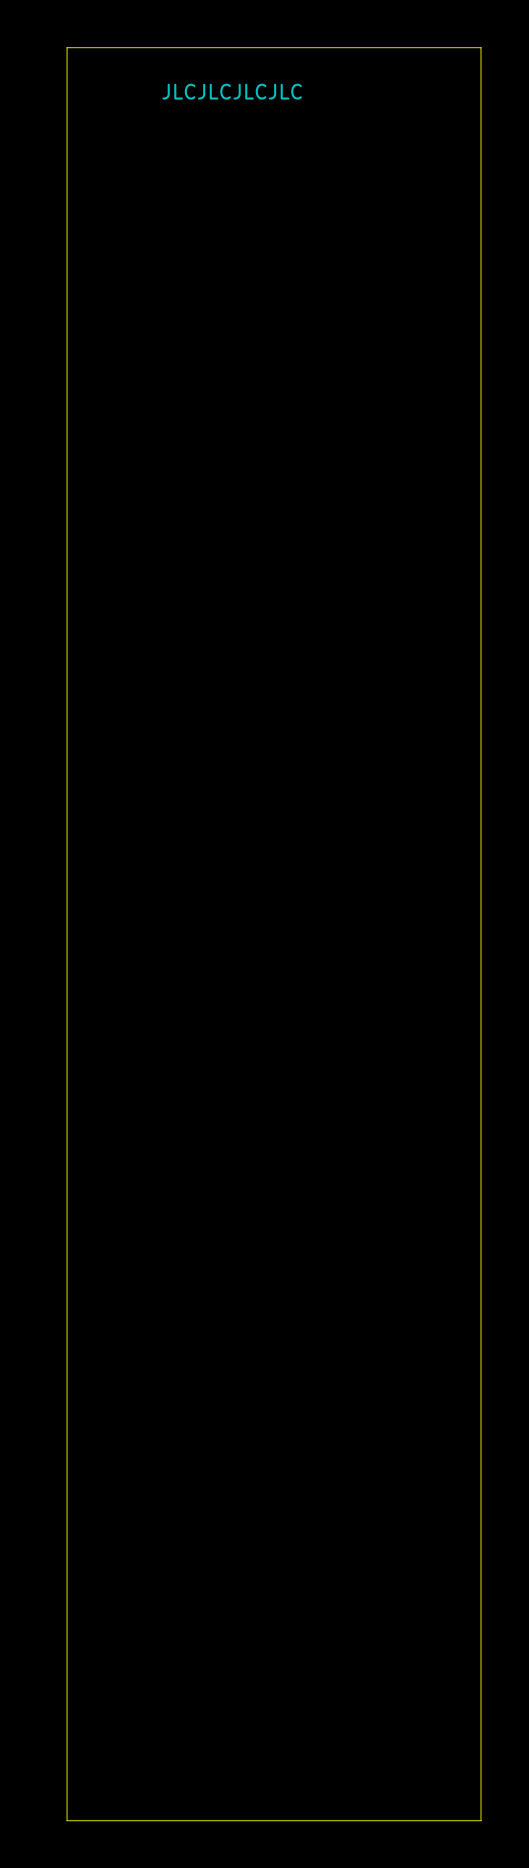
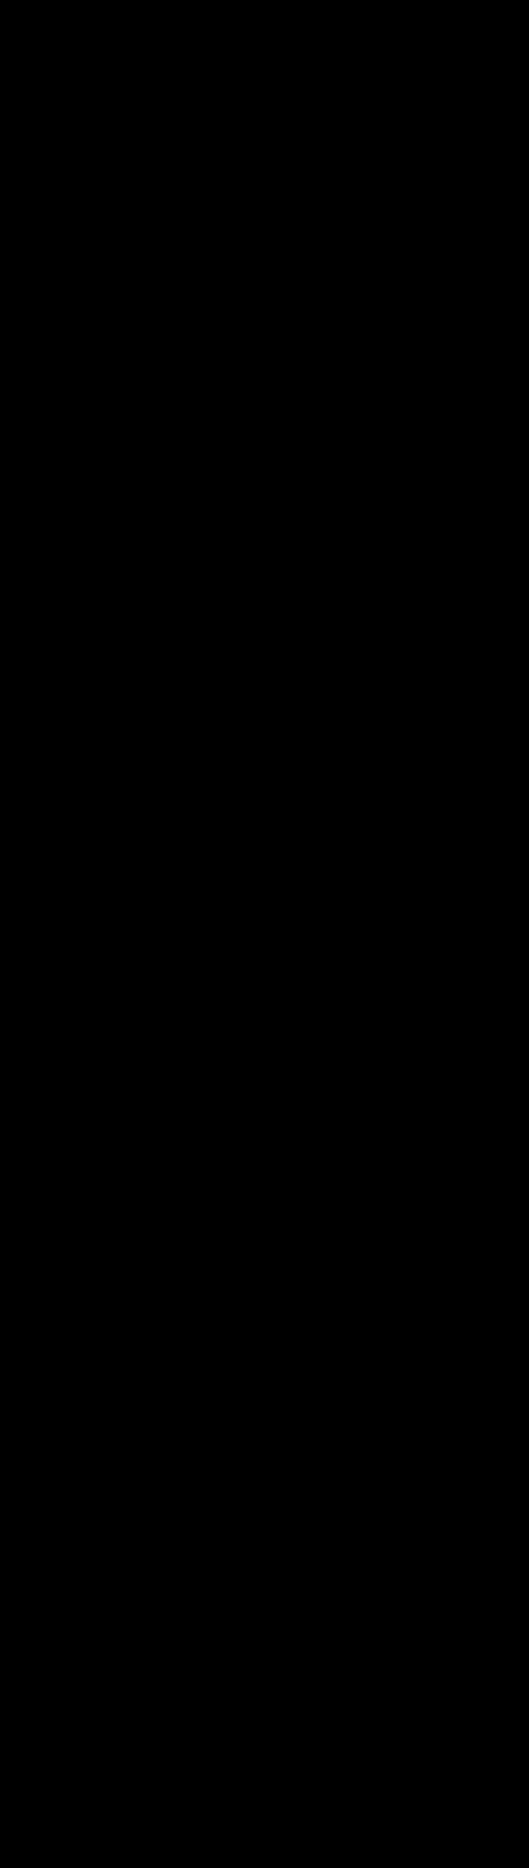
board edge: (481, 47) (67, 47) (67, 1820) (481, 1820) (481, 47) -> none
text: JLCJLCJLCJLC (232, 91) -> none

